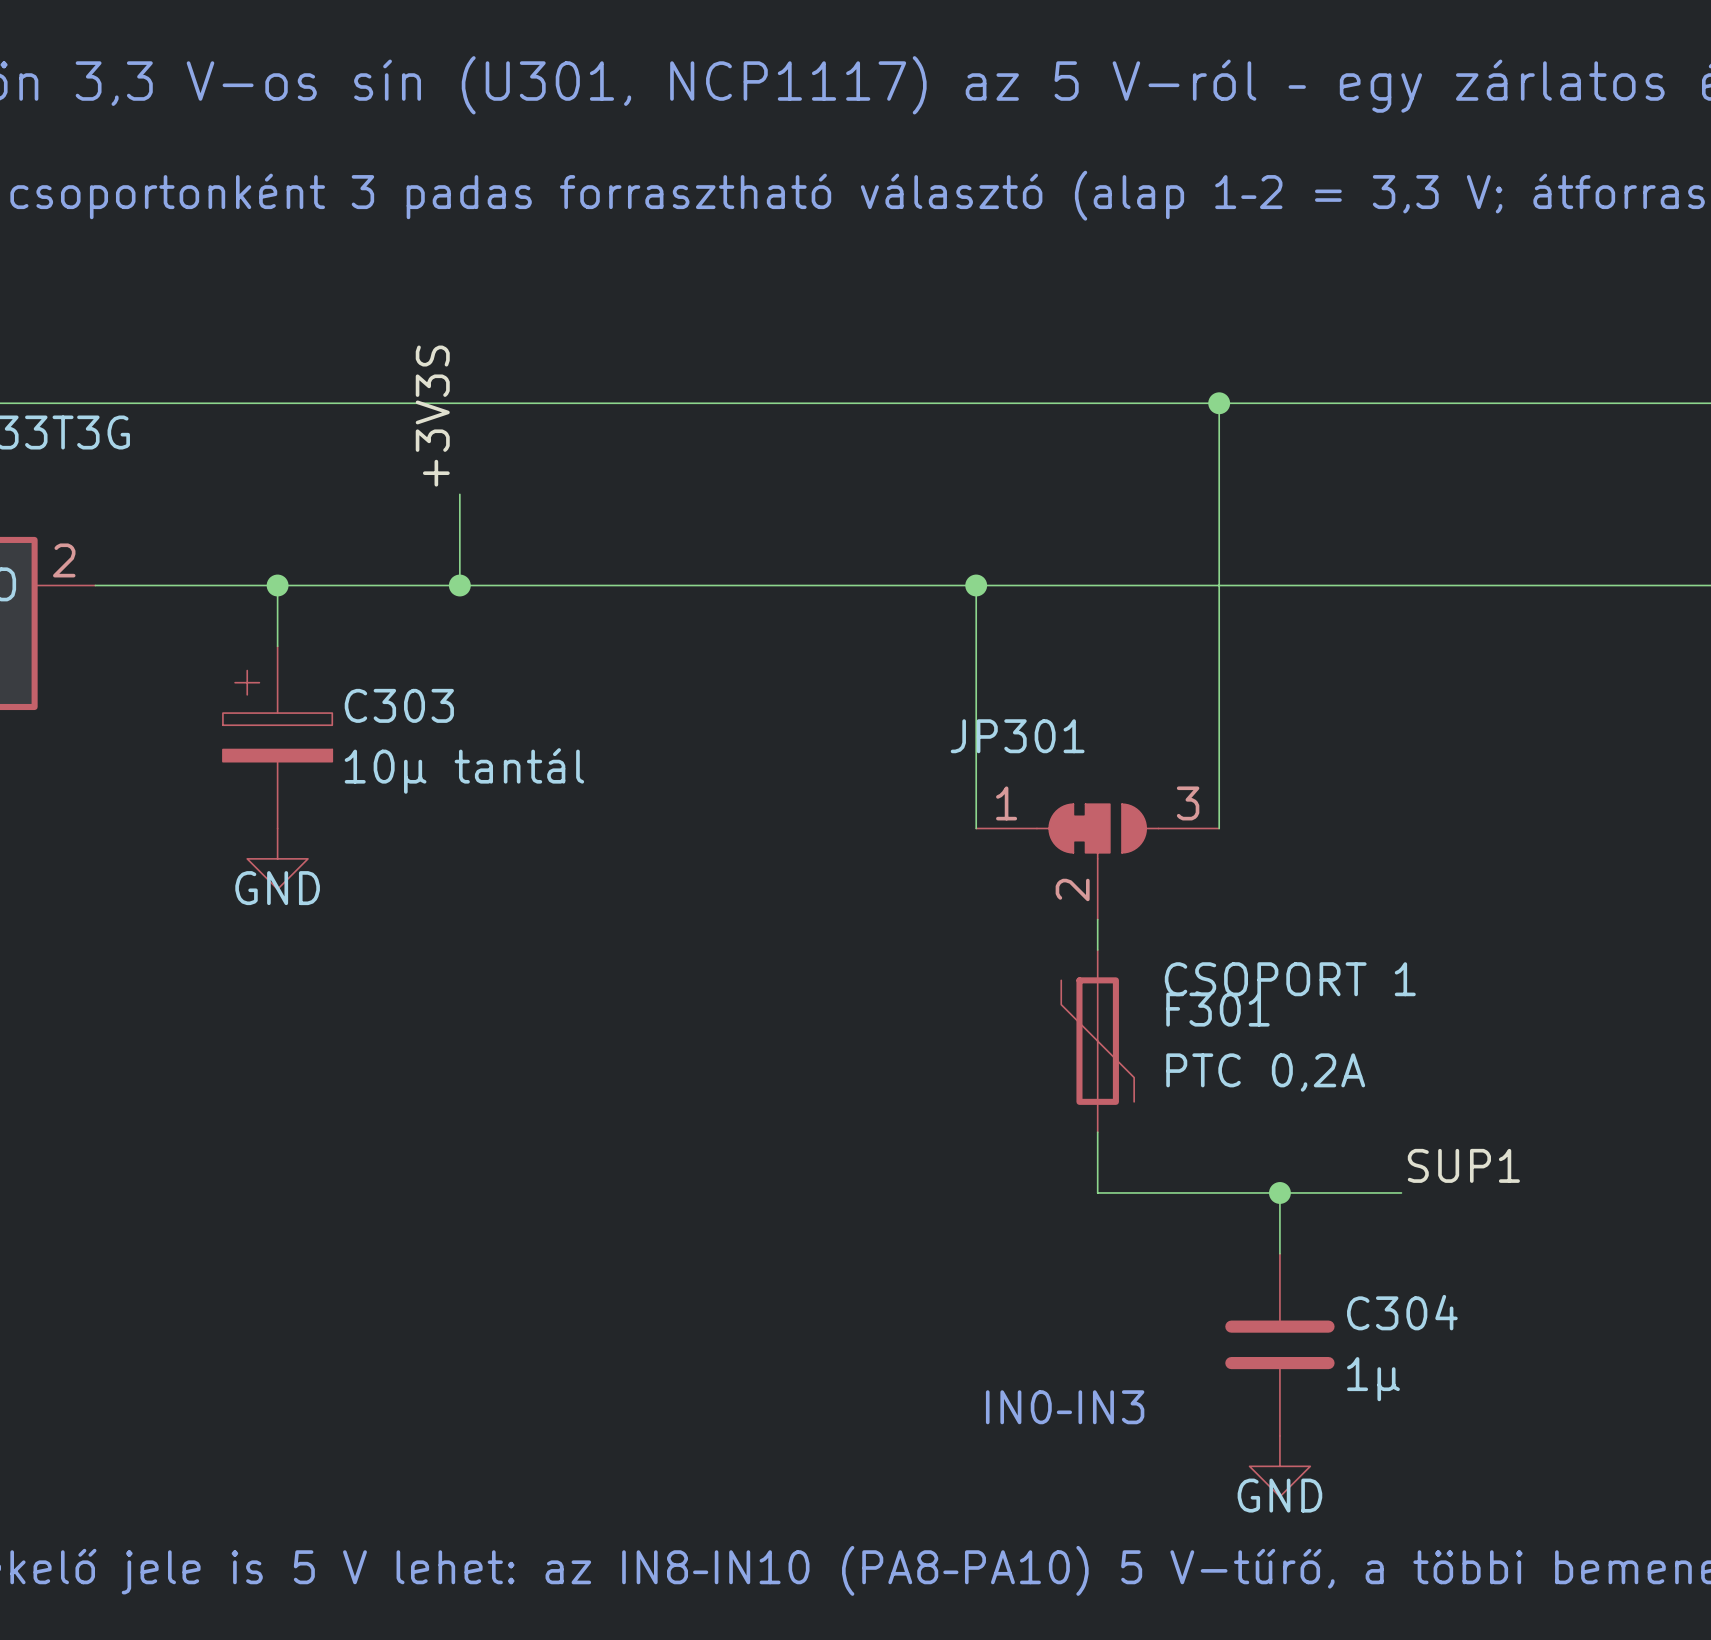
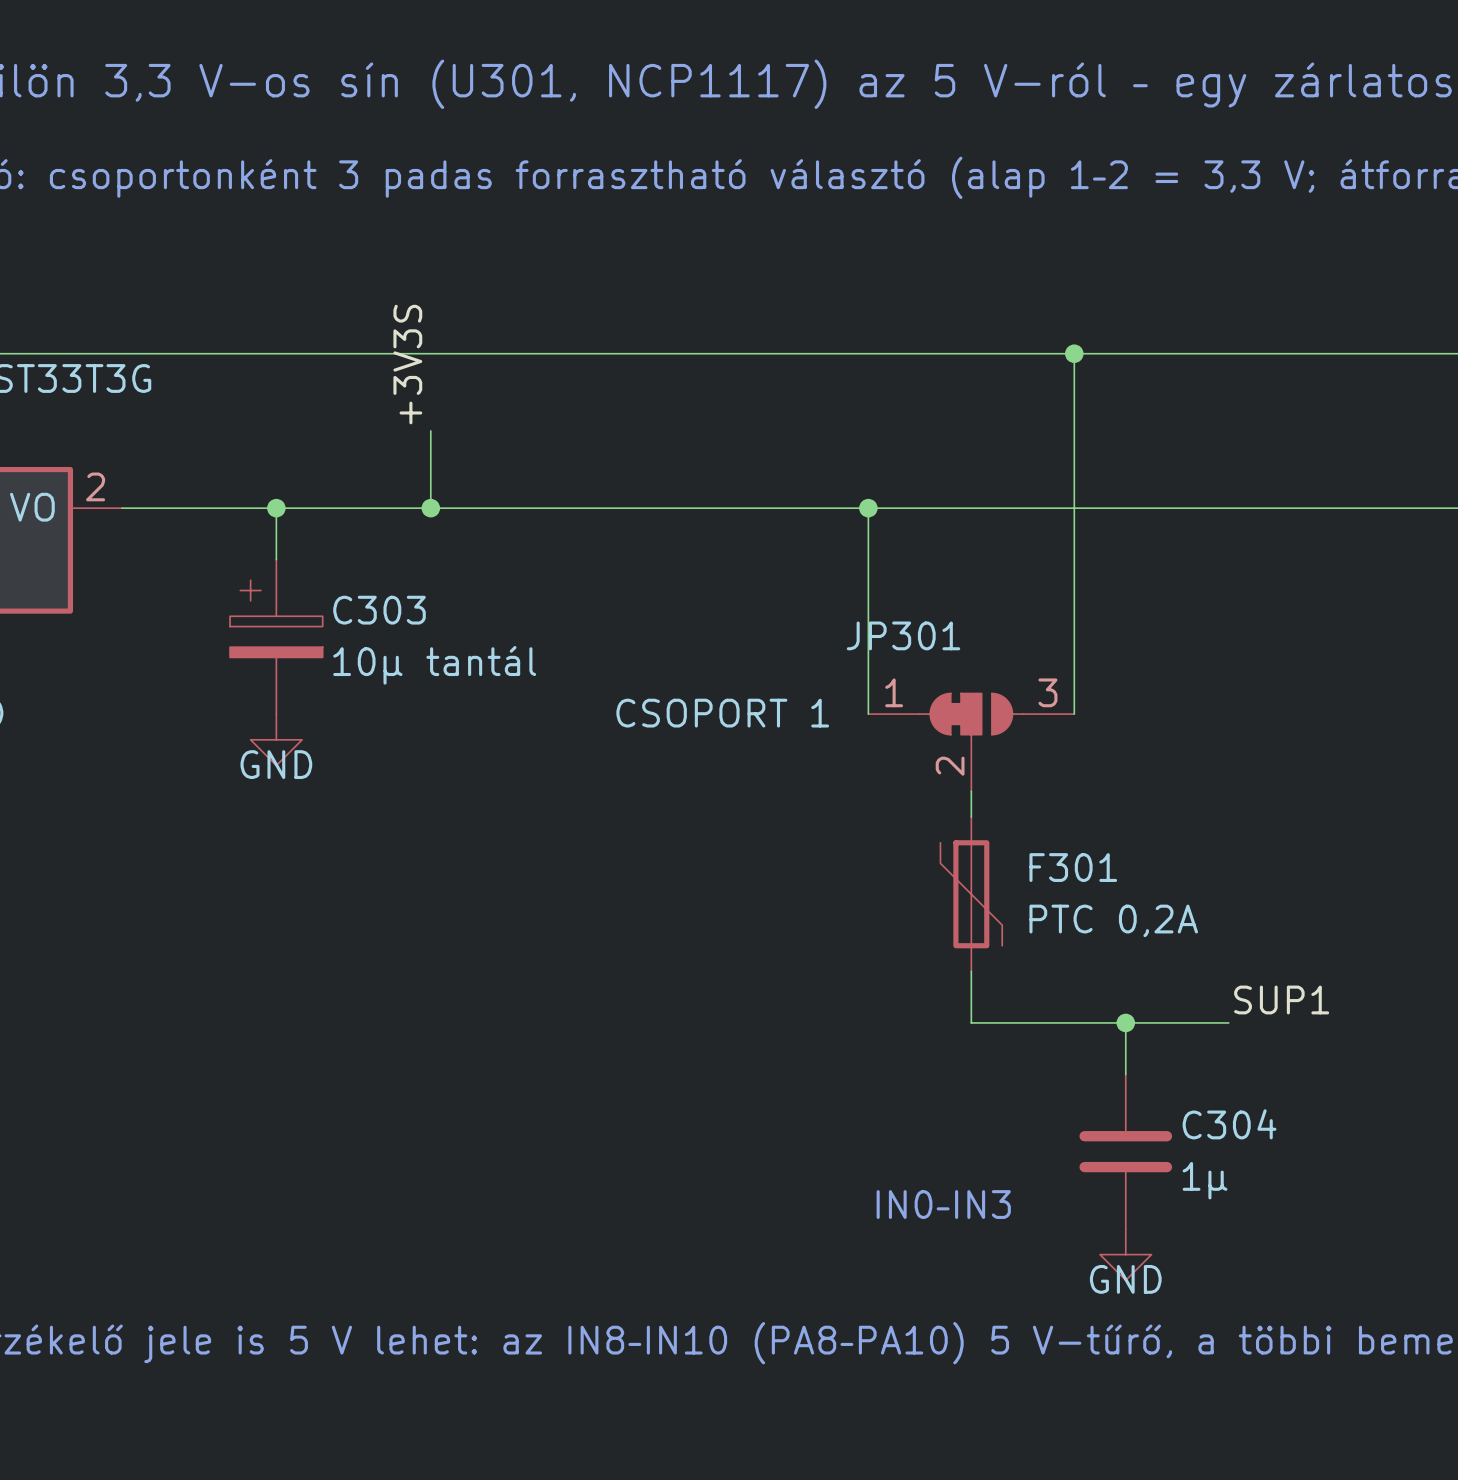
JP301 value position: CSOPORT 1 (1290, 979) -> CSOPORT 1 (722, 713)

